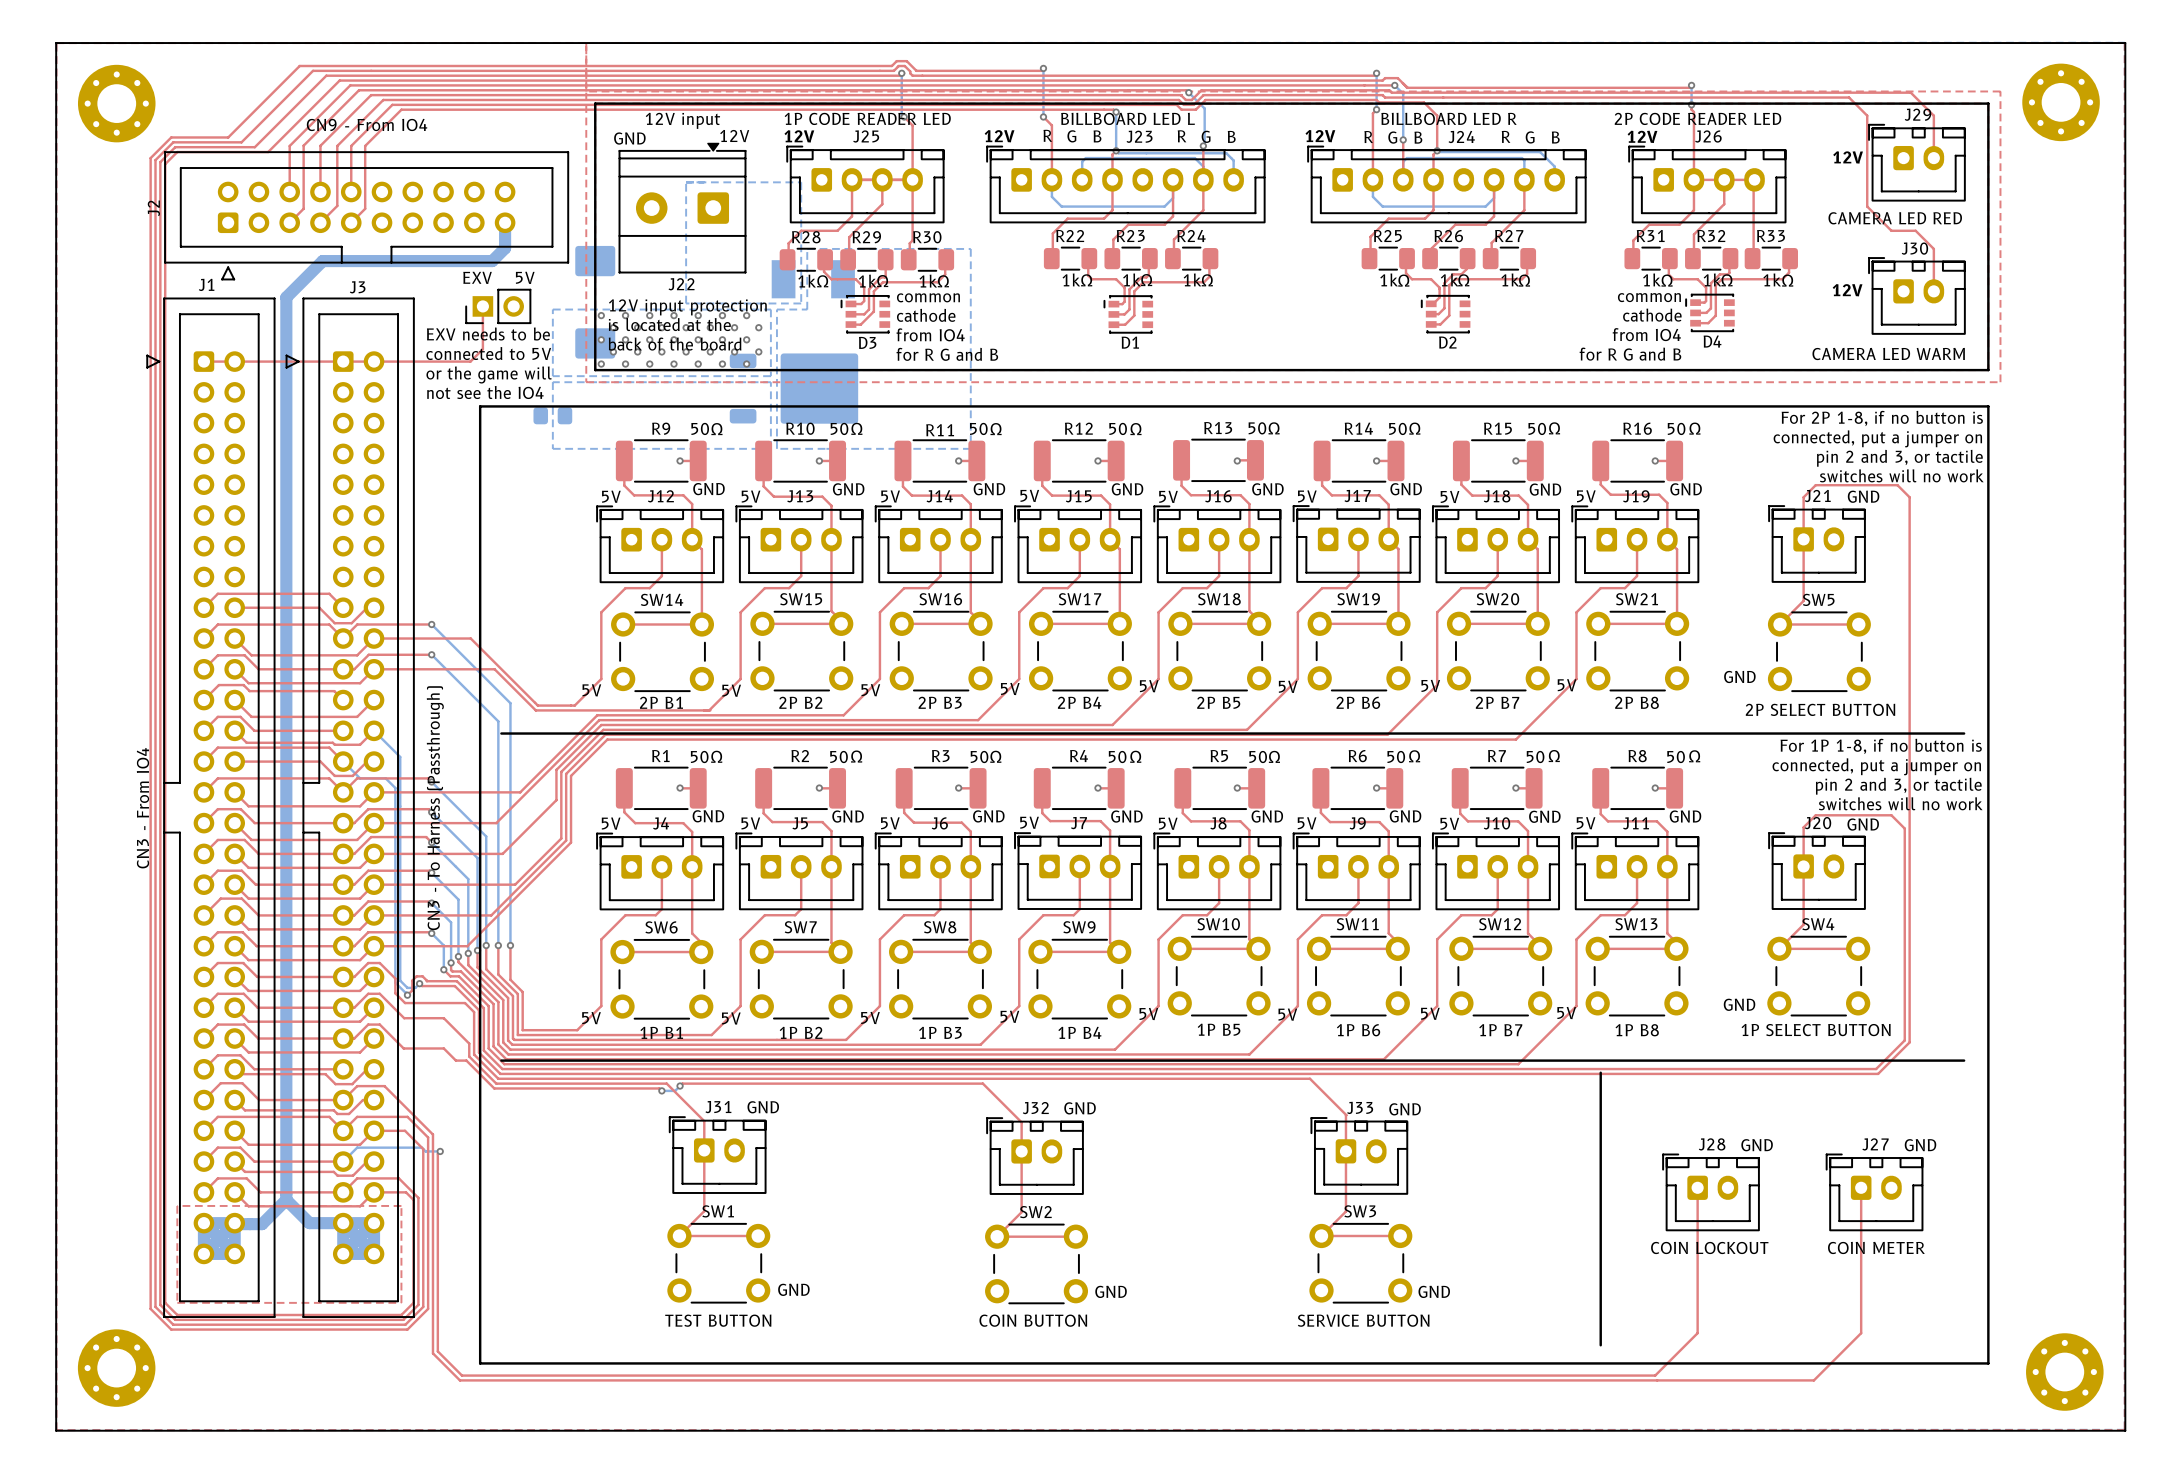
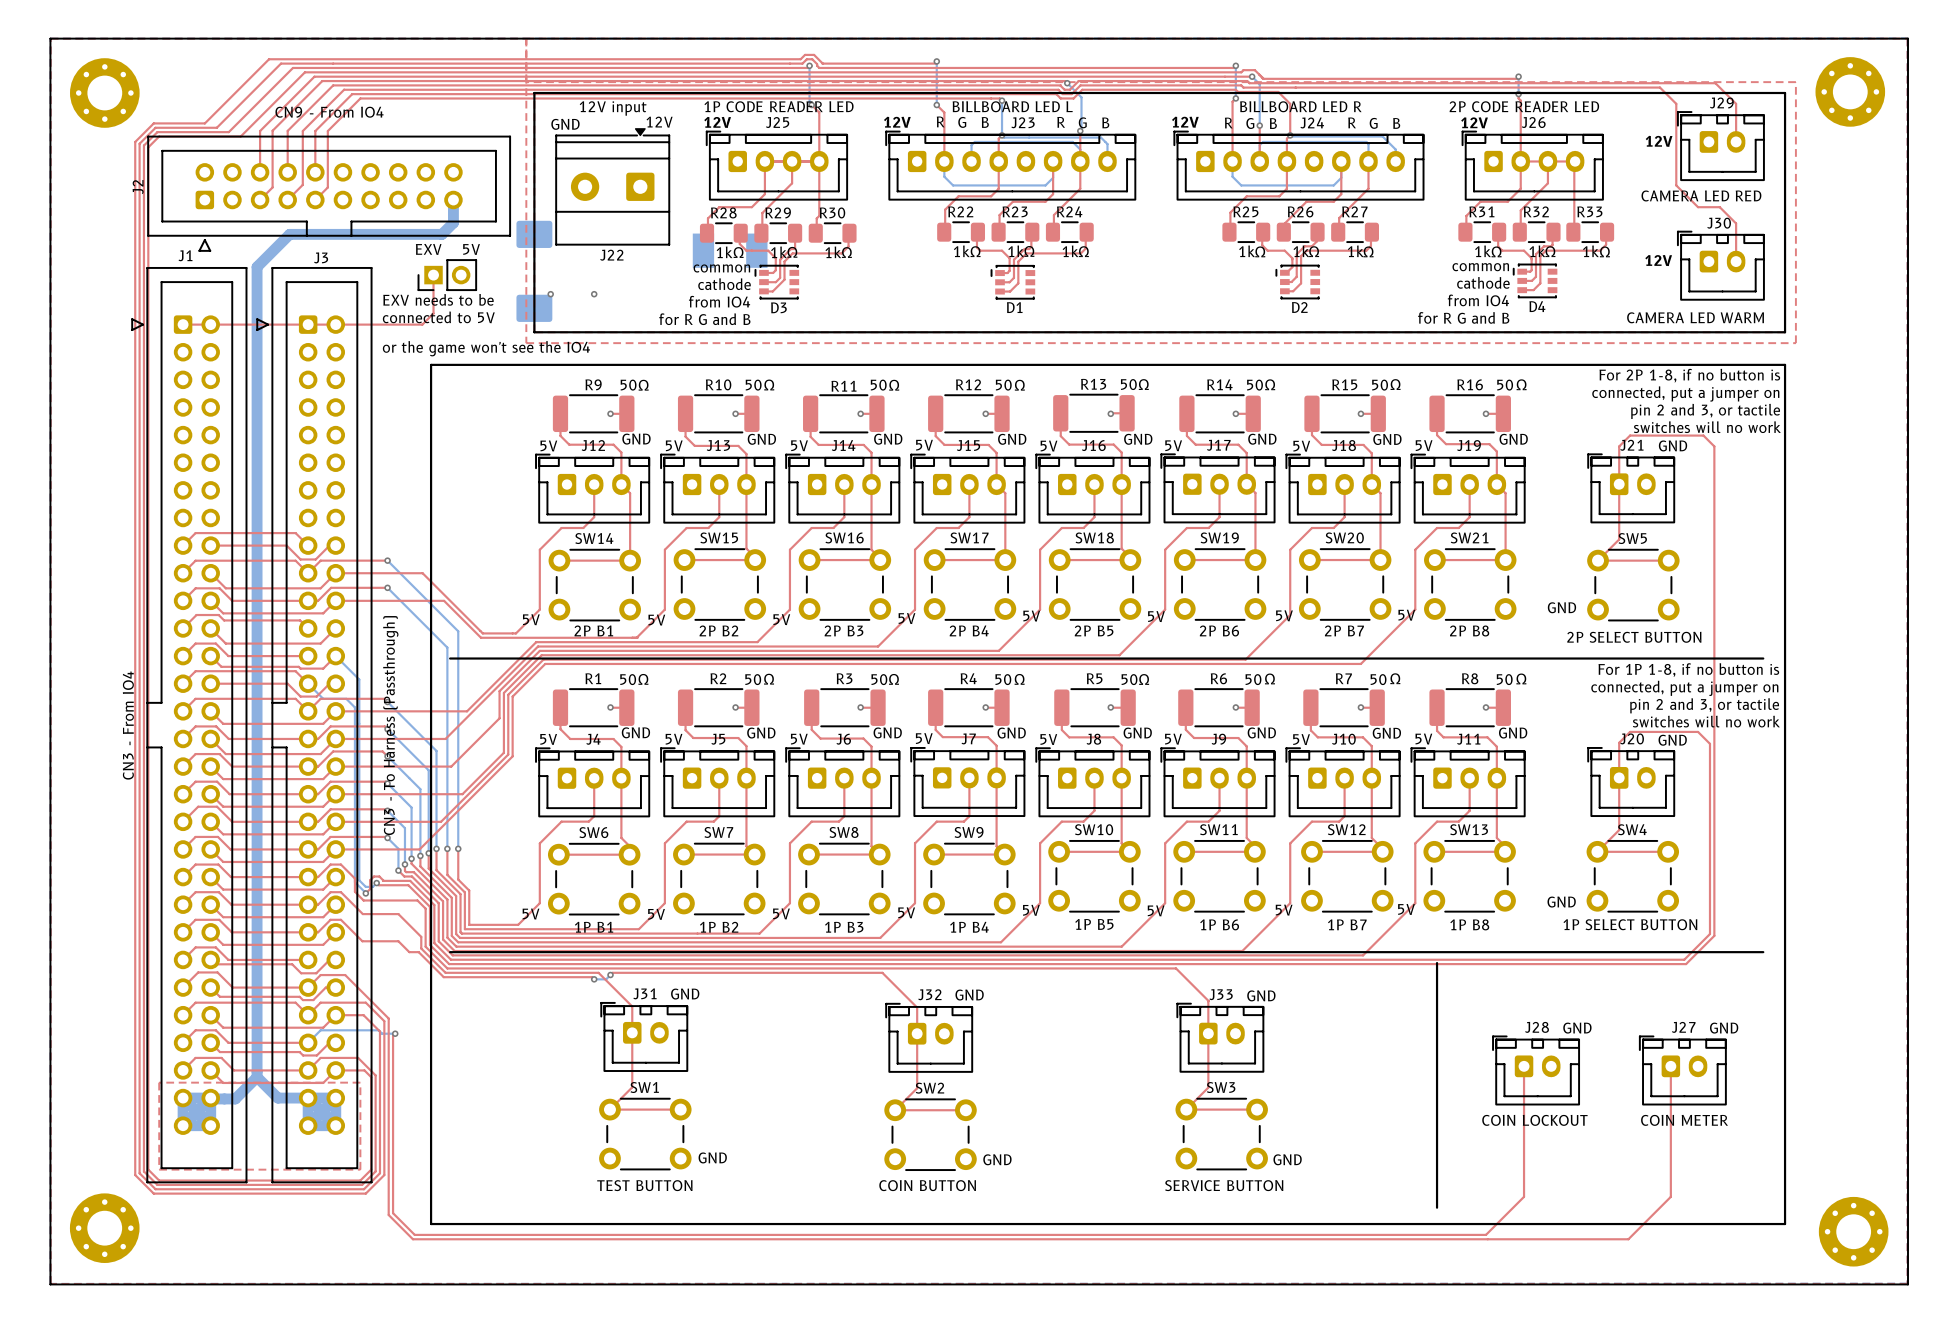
bottom zone outline: (686, 182) (801, 182) (801, 303) (686, 303) (686, 182) -> none
bottom zone outline: (807, 248) (807, 309) (776, 309) (776, 448) (970, 448) (970, 248) (807, 248) -> none
text position: common (928, 297) -> common (721, 268)
text: 12V input protection (687, 307) -> none
bottom zone outline: (552, 309) (552, 376) (770, 376) (770, 309) (552, 309) -> none
via: (601, 315) -> none
via: (625, 315) -> none
via: (649, 315) -> none
via: (673, 315) -> none
via: (698, 315) -> none
via: (722, 315) -> none
via: (746, 315) -> none
text position: cathode (926, 315) -> cathode (724, 284)
text: is located at the (669, 324) -> none
via: (637, 327) -> none
via: (686, 327) -> none
via: (710, 327) -> none
via: (734, 327) -> none
via: (758, 327) -> none
text position: from IO4 (930, 334) -> from IO4 (719, 301)
via: (601, 339) -> none
via: (625, 339) -> none
via: (649, 339) -> none
via: (673, 339) -> none
via: (698, 339) -> none
via: (722, 339) -> none
via: (746, 339) -> none
text: back of the board (675, 344) -> none
via: (613, 351) -> none
via: (637, 351) -> none
via: (661, 351) -> none
via: (686, 351) -> none
via: (710, 351) -> none
via: (734, 351) -> none
via: (758, 351) -> none
text position: for R G and B (947, 354) -> for R G and B (704, 319)
via: (601, 364) -> none
via: (625, 364) -> none
via: (649, 364) -> none
via: (673, 364) -> none
via: (698, 364) -> none
via: (722, 364) -> none
via: (746, 364) -> none
text: or the game will (489, 375) -> none
bottom zone outline: (552, 382) (770, 382) (770, 448) (552, 448) (552, 382) -> none
part: (793, 388) -> none
text: not see the IO4 (485, 392) -> or the game won't see the IO4 (486, 348)
part: (552, 415) -> none

